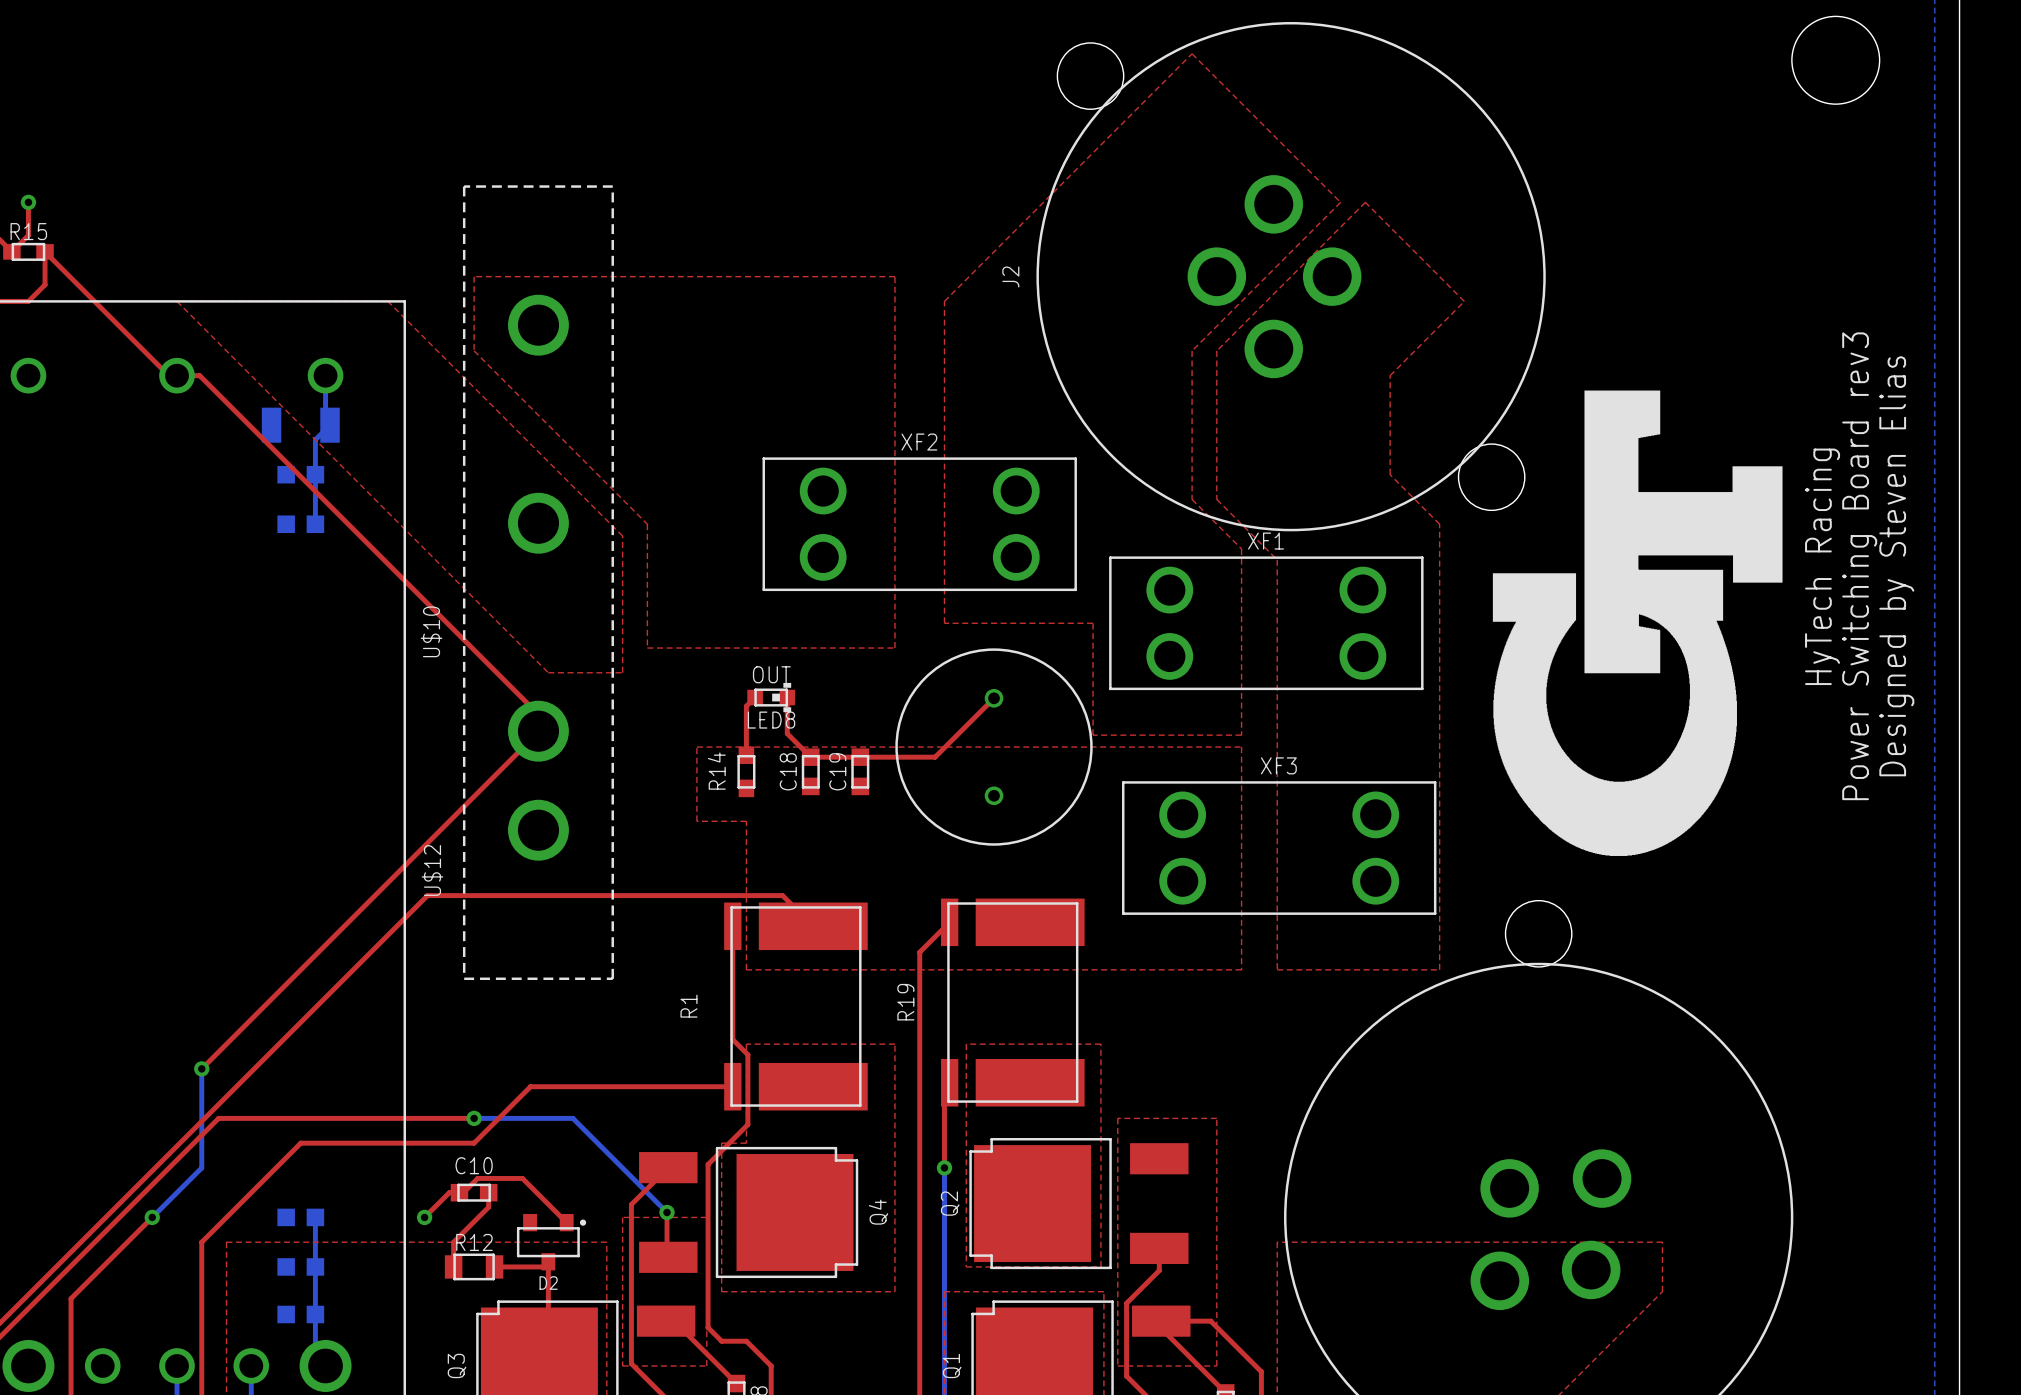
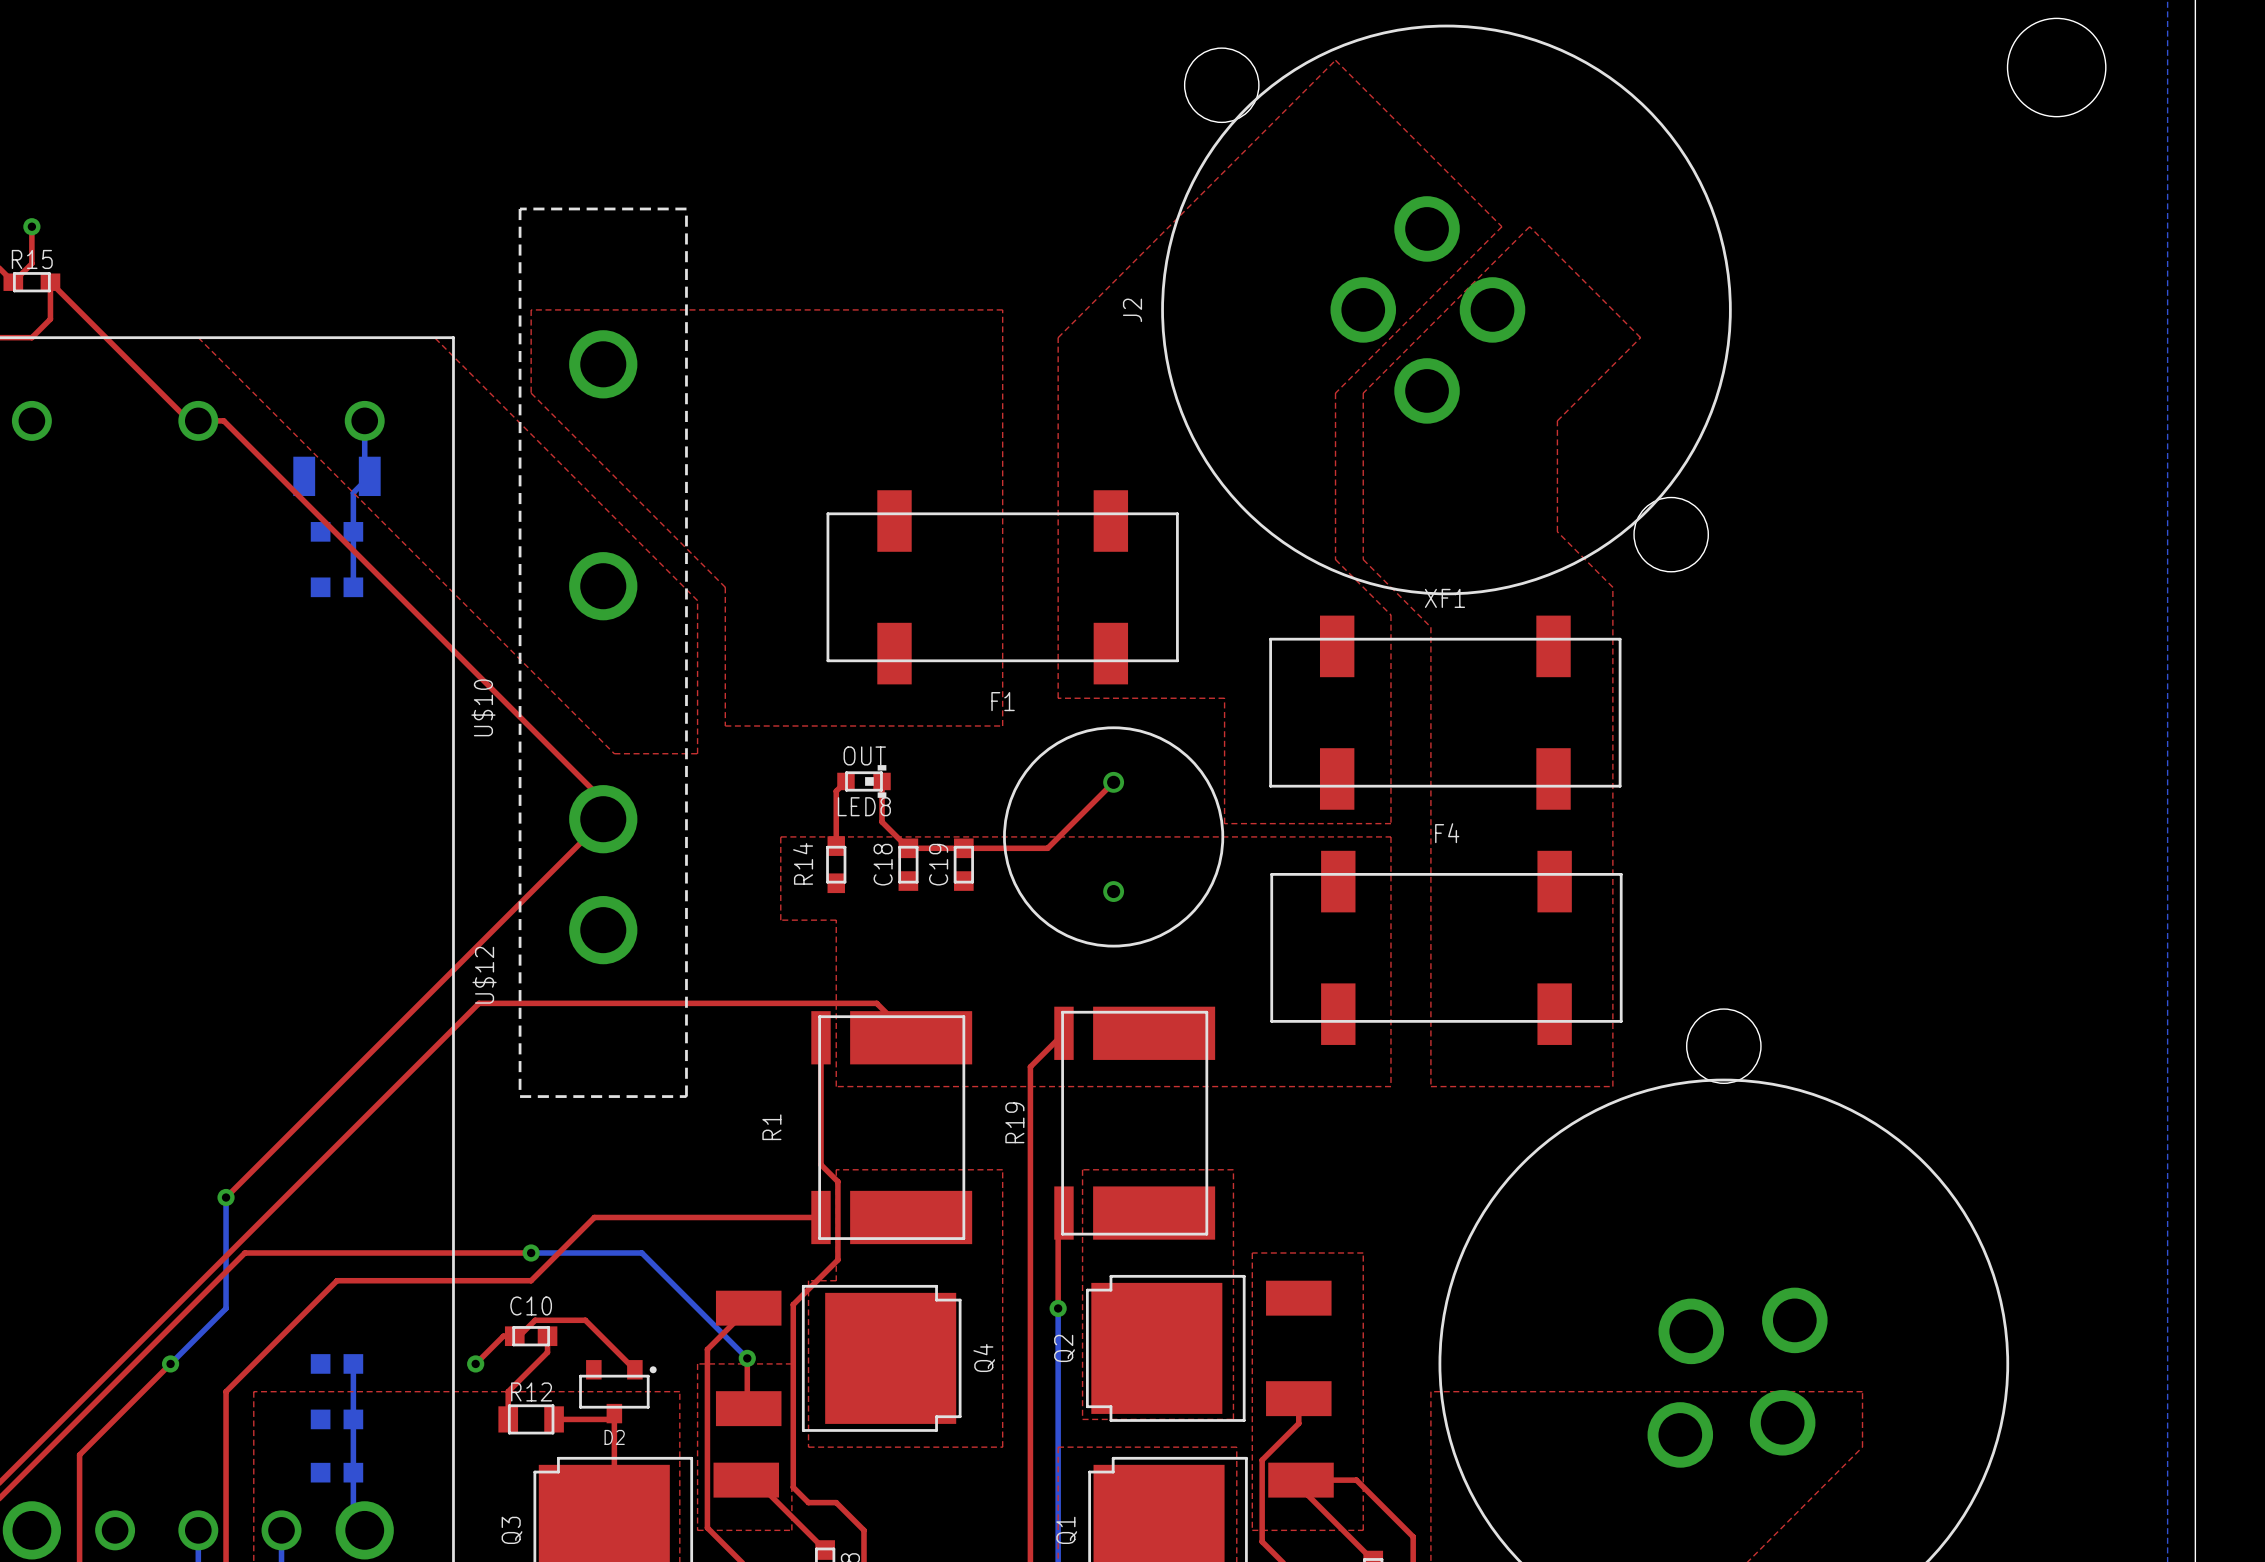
drawing: [1492, 390, 1783, 856] -> none
F1: none -> (1002, 587)
XF2: (919, 524) -> none
XF1 footprint: [1109, 556, 1424, 691] -> [1269, 615, 1622, 810]
text: HyTech Racing (1822, 566) -> none
text: Power Switching Board rev3 (1859, 566) -> none
text: Designed by Steven Elias (1896, 566) -> none
F4: none -> (1446, 947)
XF3: (1279, 848) -> none

